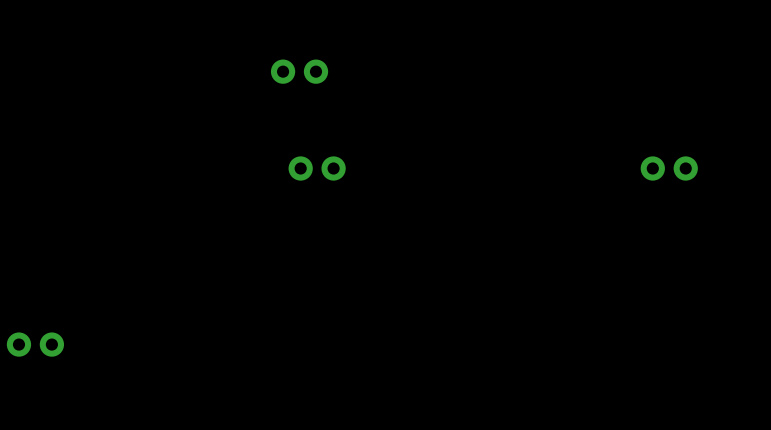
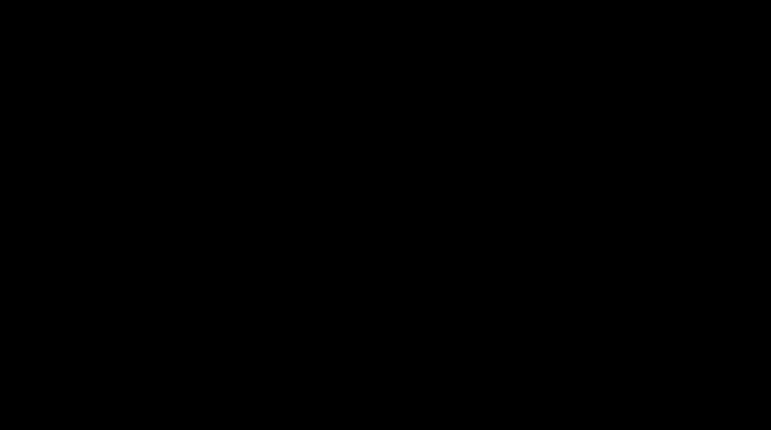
part: (299, 71) -> none
part: (317, 168) -> none
part: (669, 168) -> none
part: (35, 344) -> none

